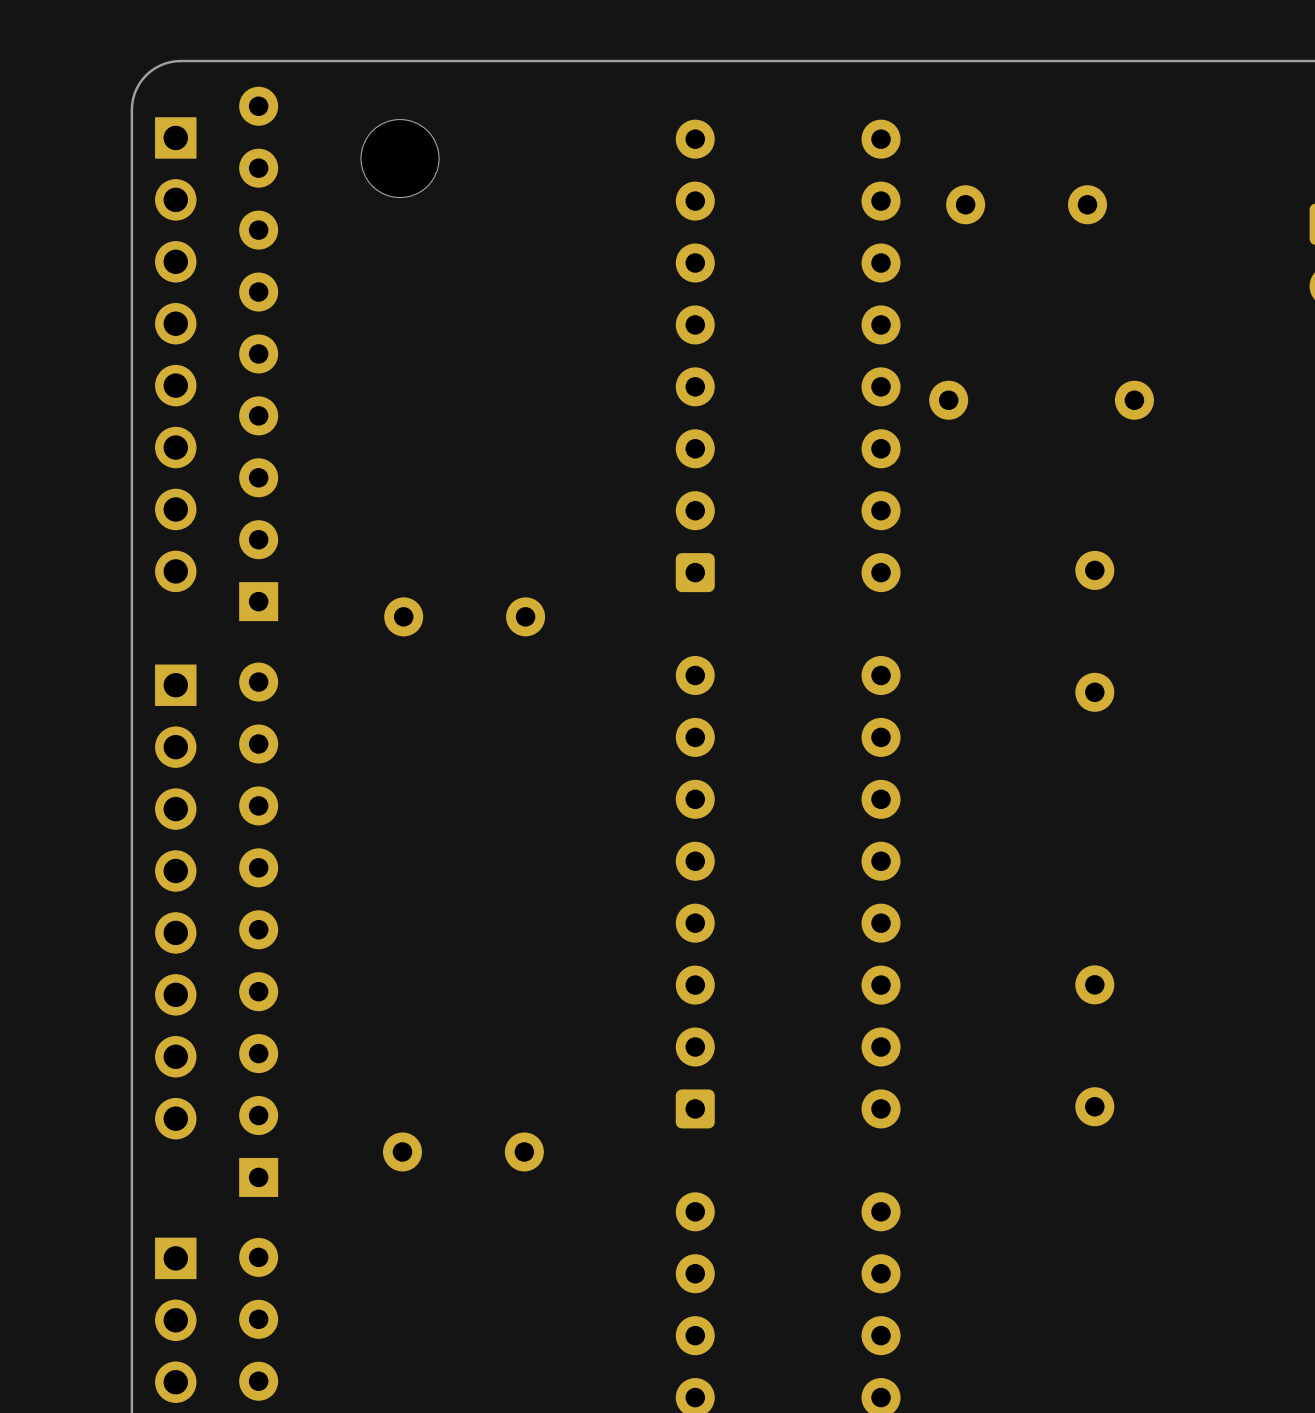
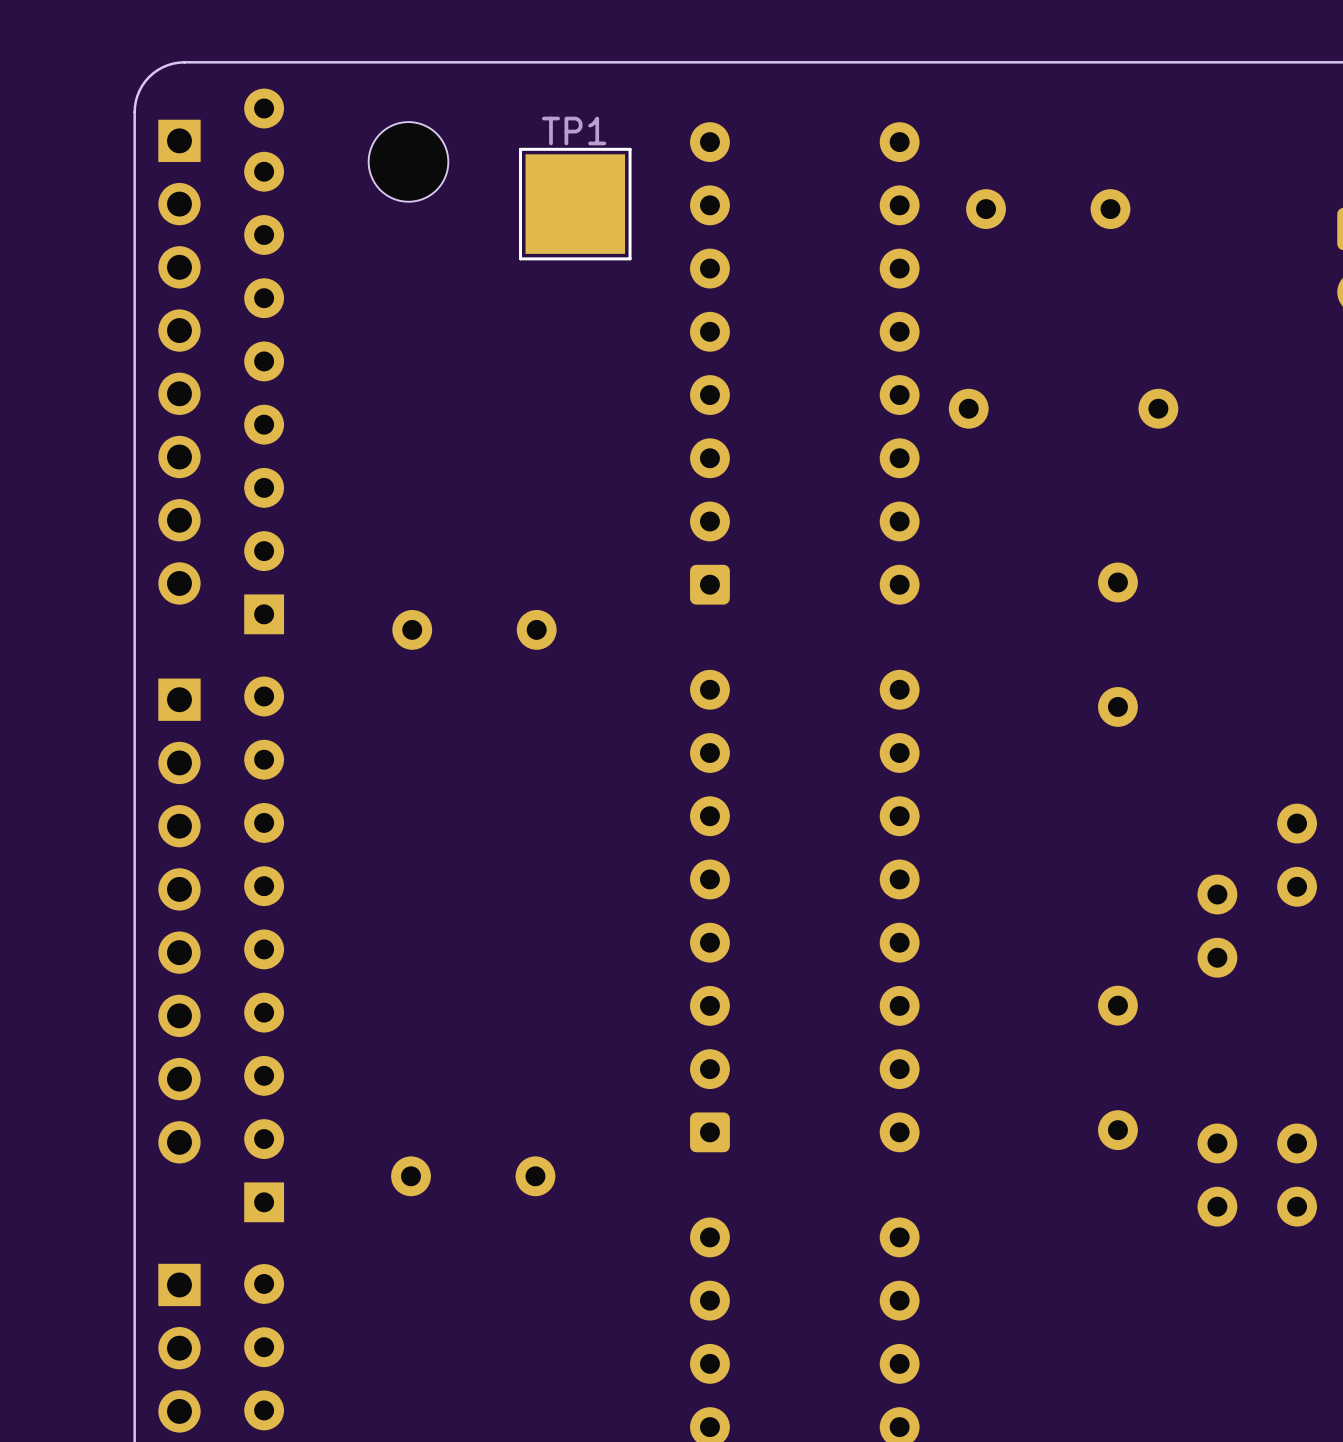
TP1: none -> (575, 204)
part: none -> (1297, 855)
part: none -> (1217, 926)
part: none -> (1217, 1175)
part: none -> (1297, 1175)

